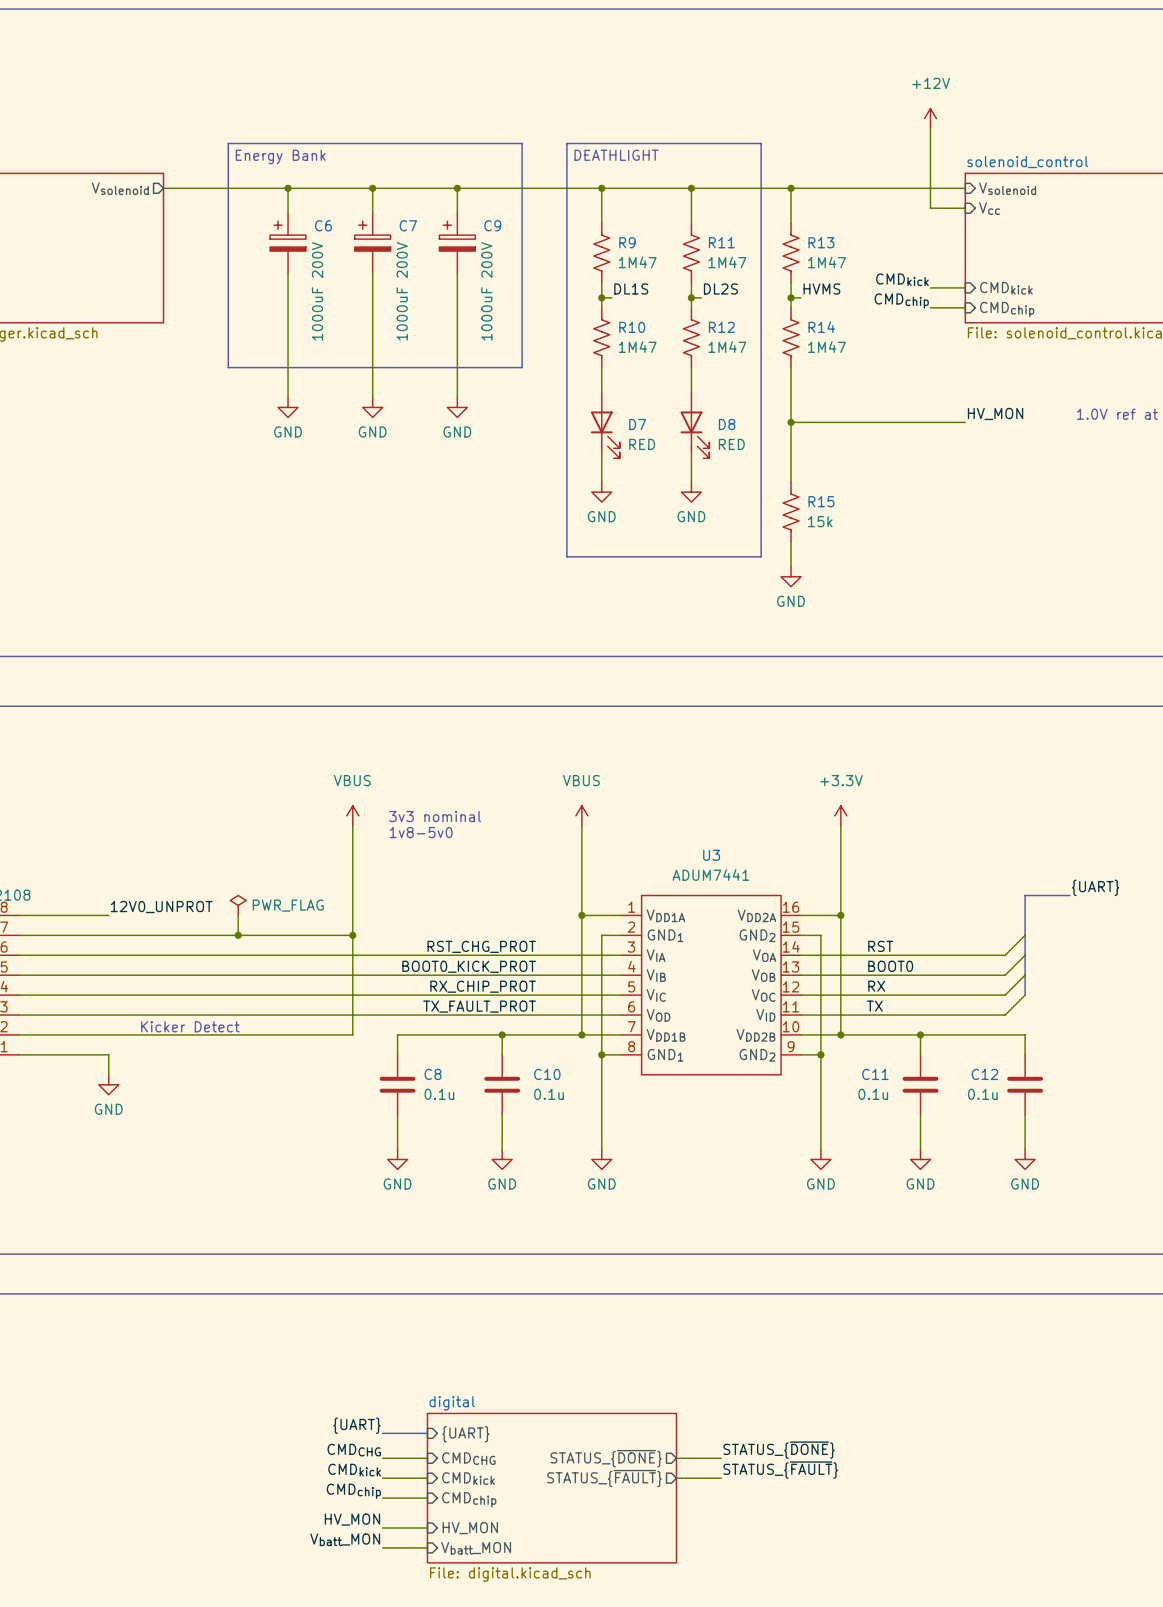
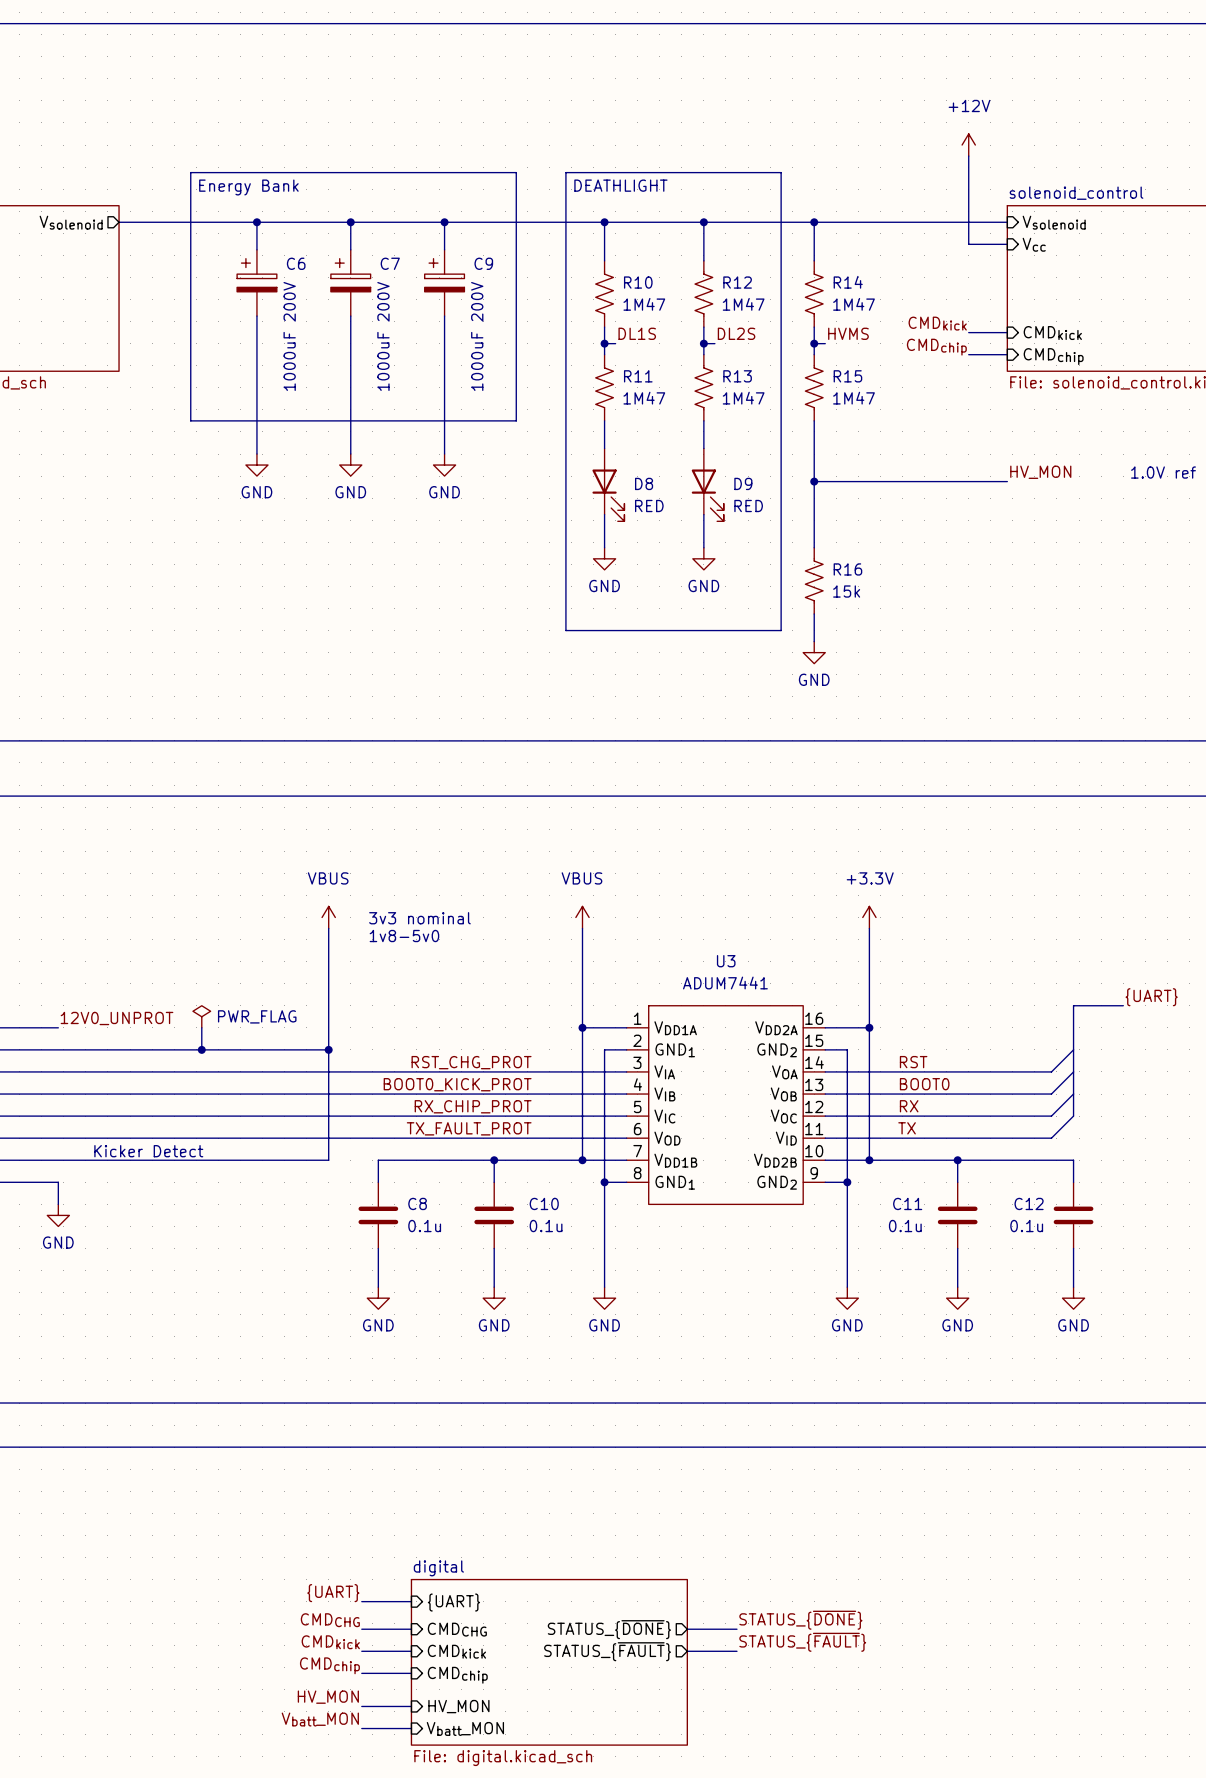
R9 name: R9 (627, 242) -> R10 (638, 282)
R11 name: R11 (721, 242) -> R12 (737, 282)
R13 name: R13 (821, 242) -> R14 (848, 282)
R10 name: R10 (632, 327) -> R11 (638, 376)
R12 name: R12 (721, 327) -> R13 (737, 376)
R14 name: R14 (821, 327) -> R15 (847, 376)
D7 name: D7 (637, 424) -> D8 (644, 483)
D8 name: D8 (727, 424) -> D9 (743, 483)
R15 name: R15 (821, 501) -> R16 (847, 569)

